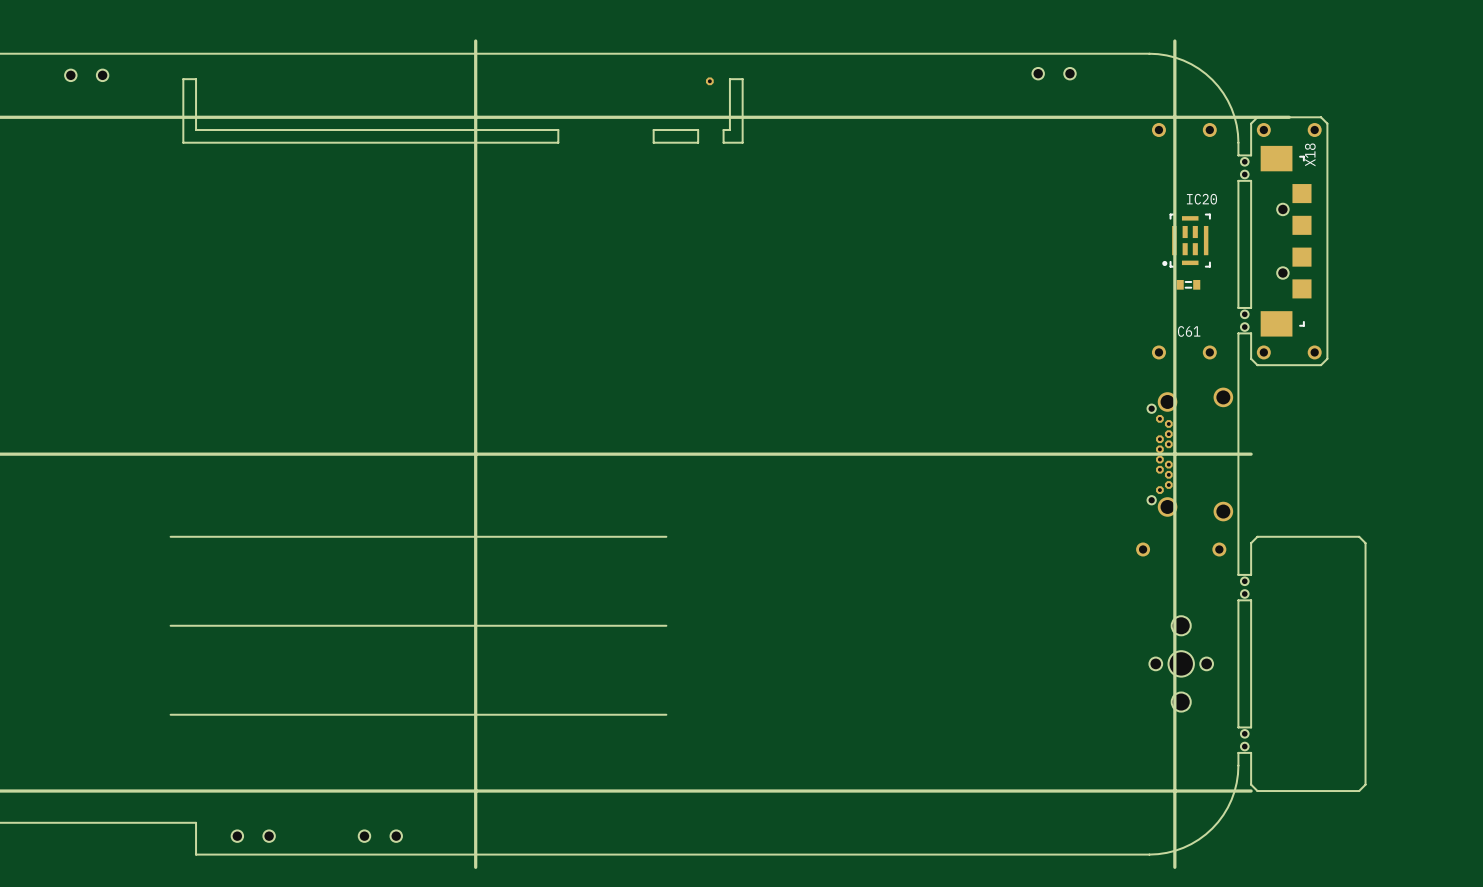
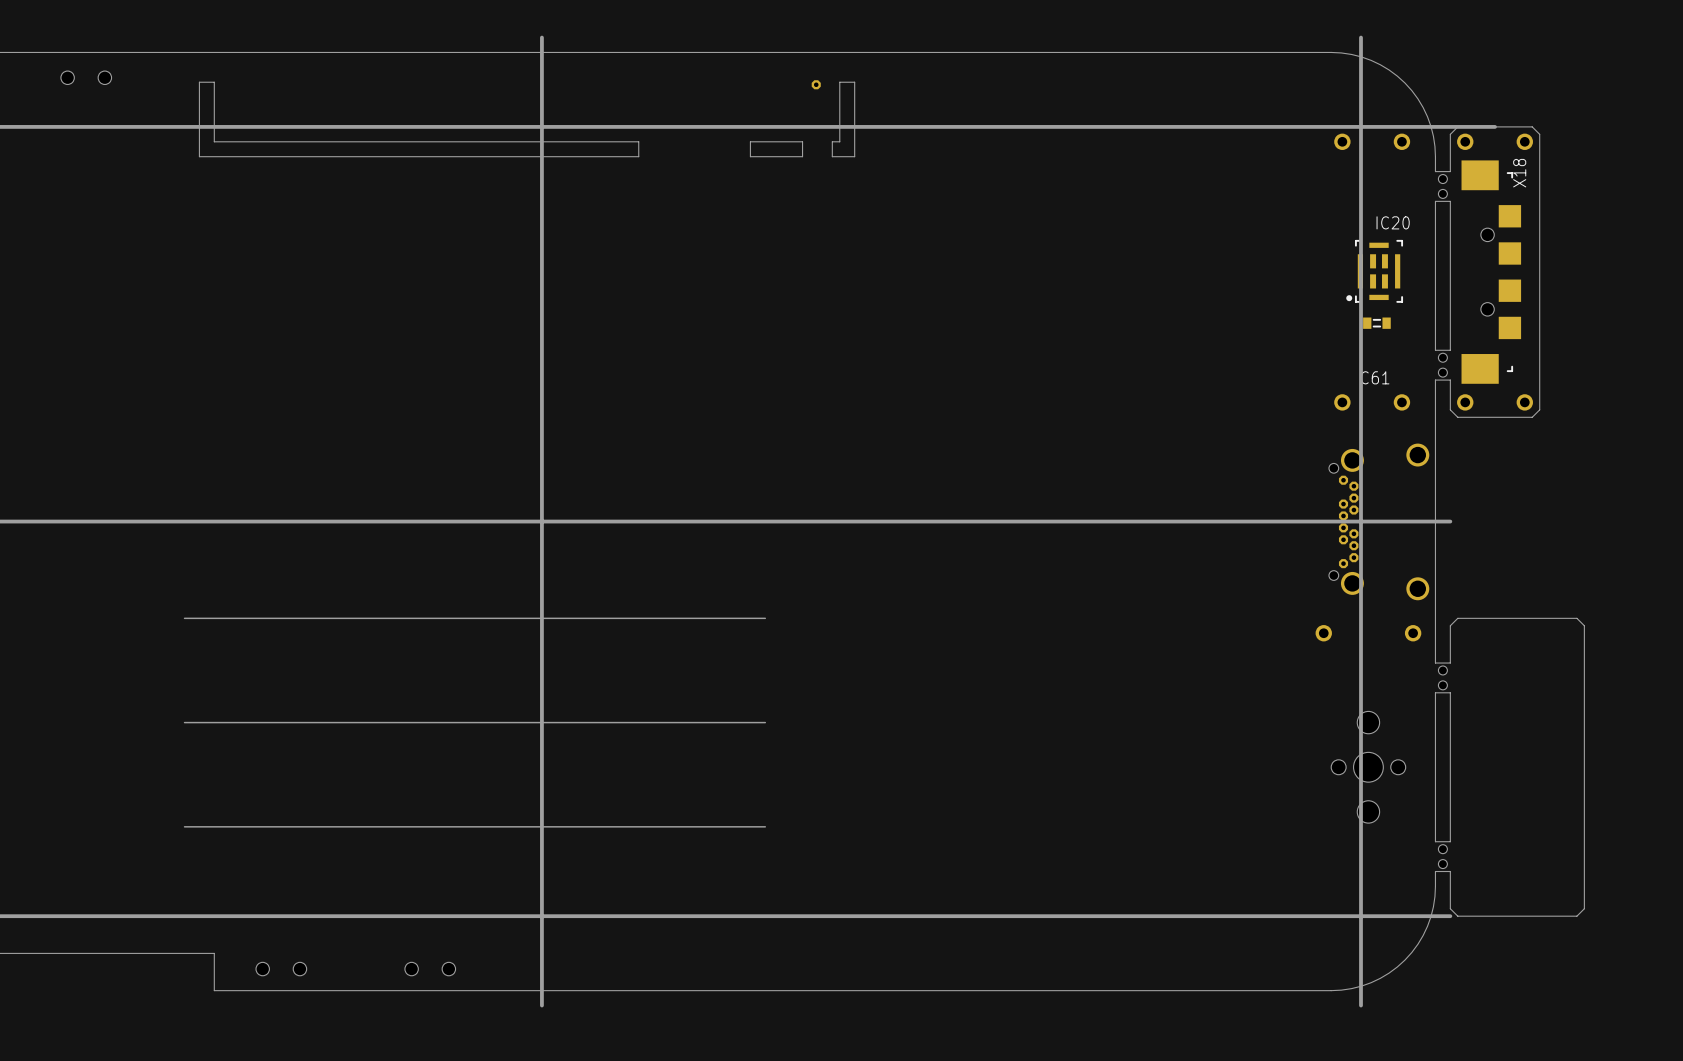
part: (1054, 73) -> none

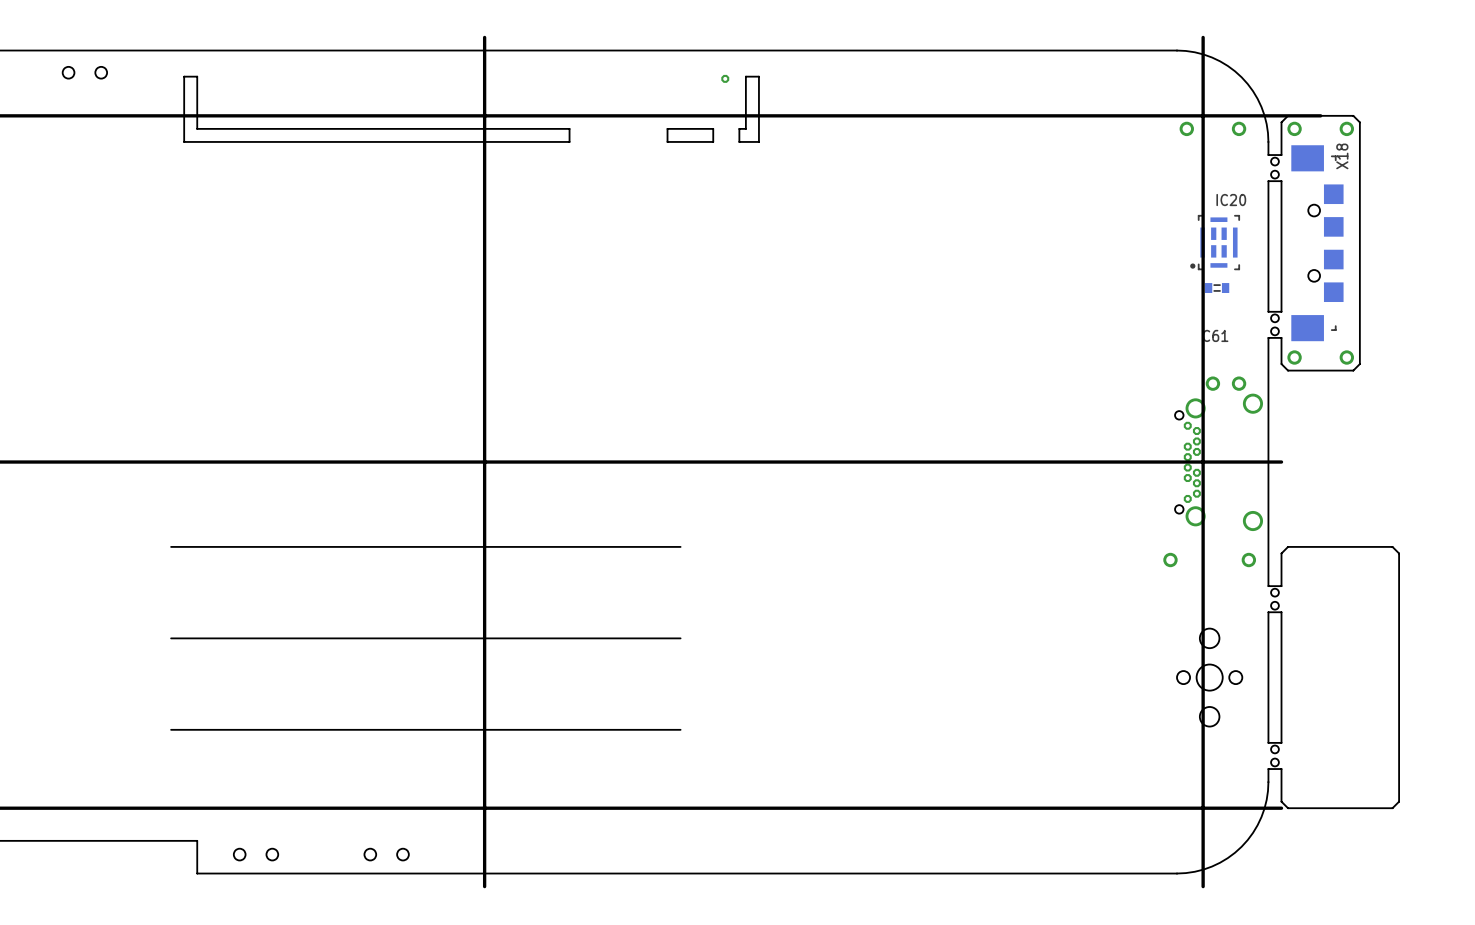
part: (1342, 402) -> none
part: (1401, 402) -> none
part: none -> (1212, 383)
part: none -> (1239, 383)

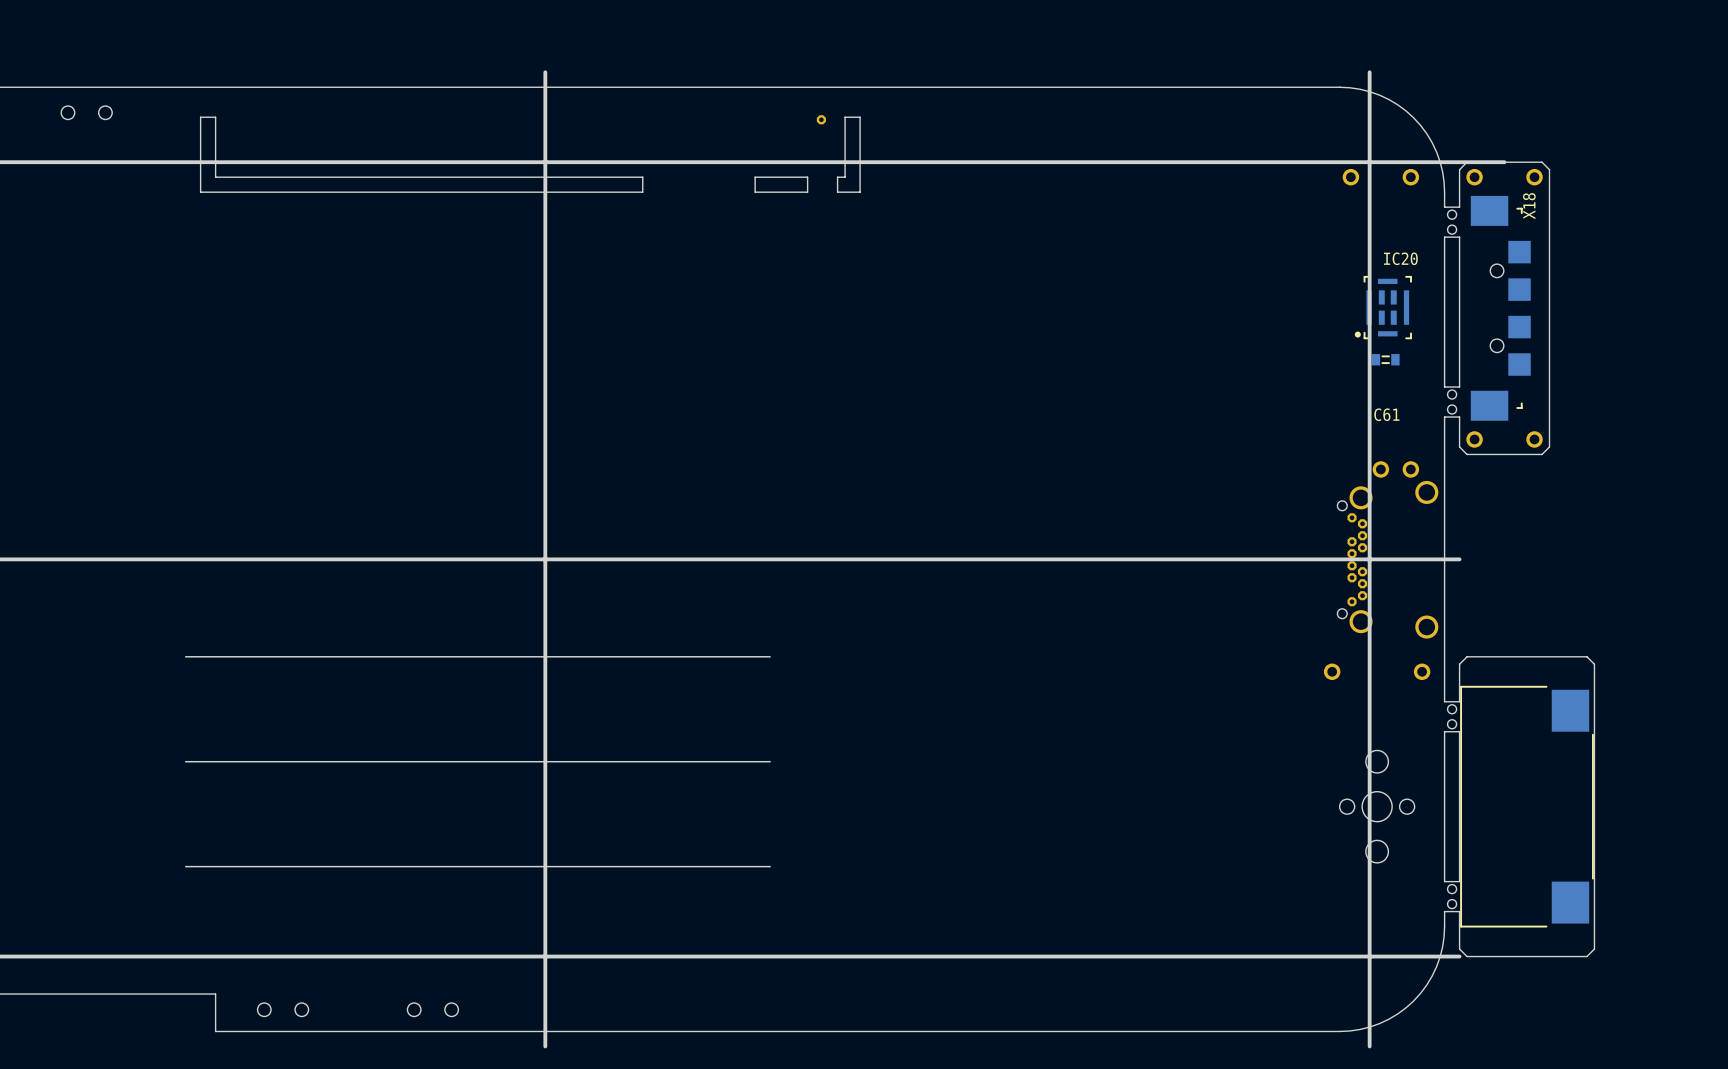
part: none -> (1527, 806)

